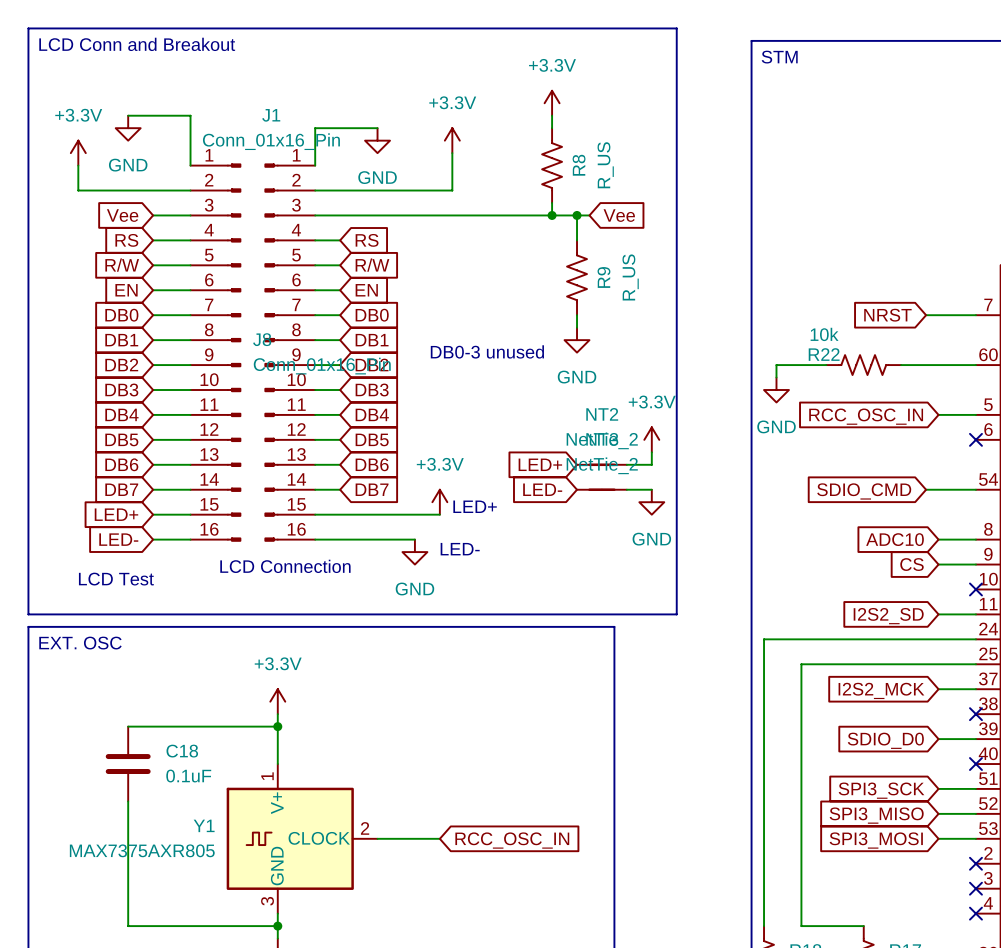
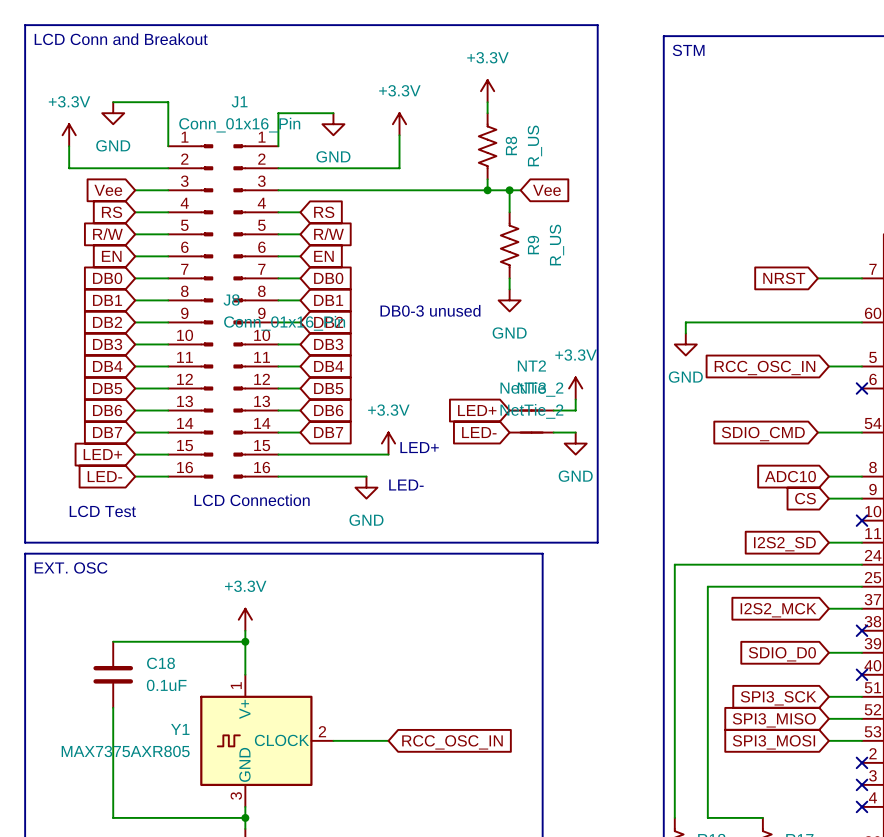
R22: 10k (863, 365) -> none

